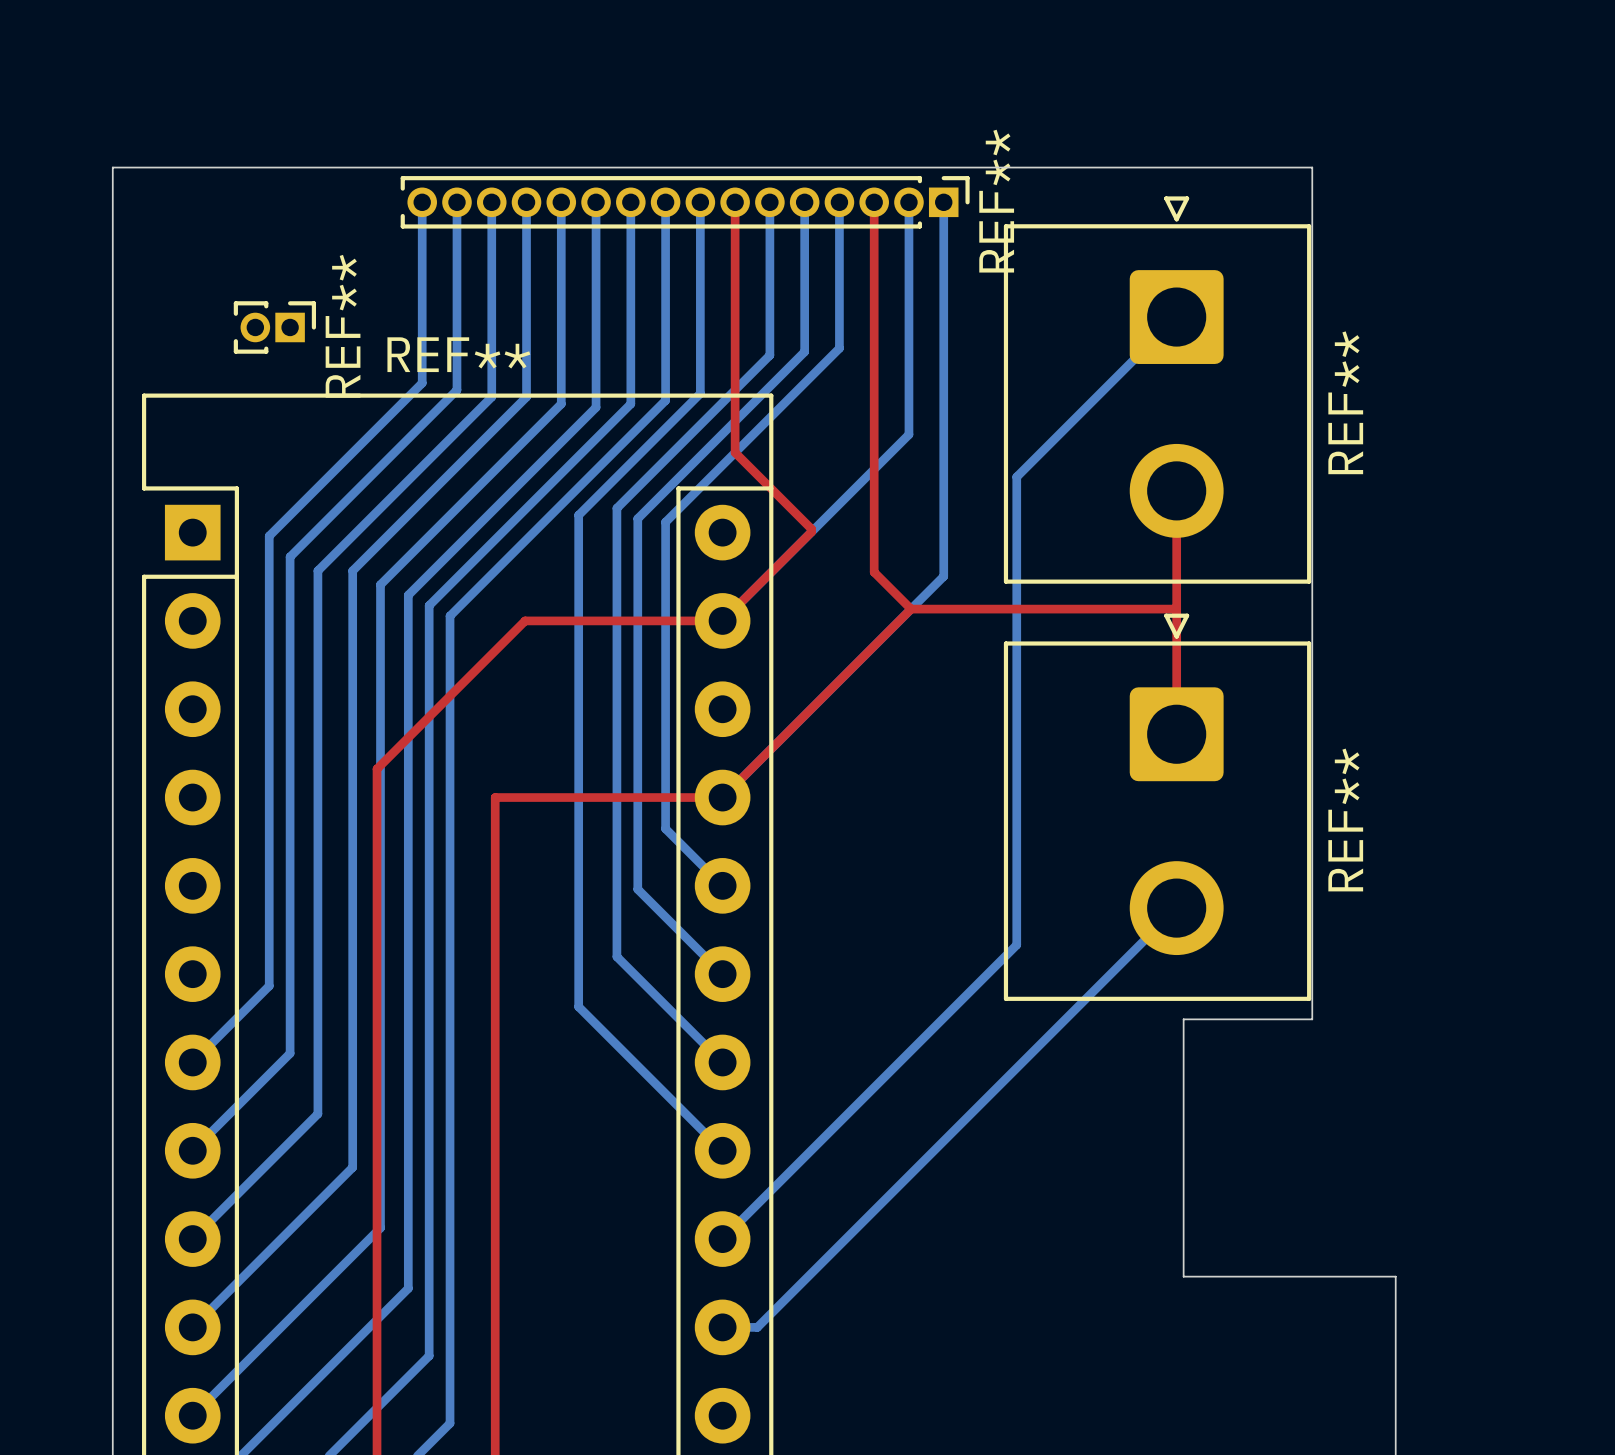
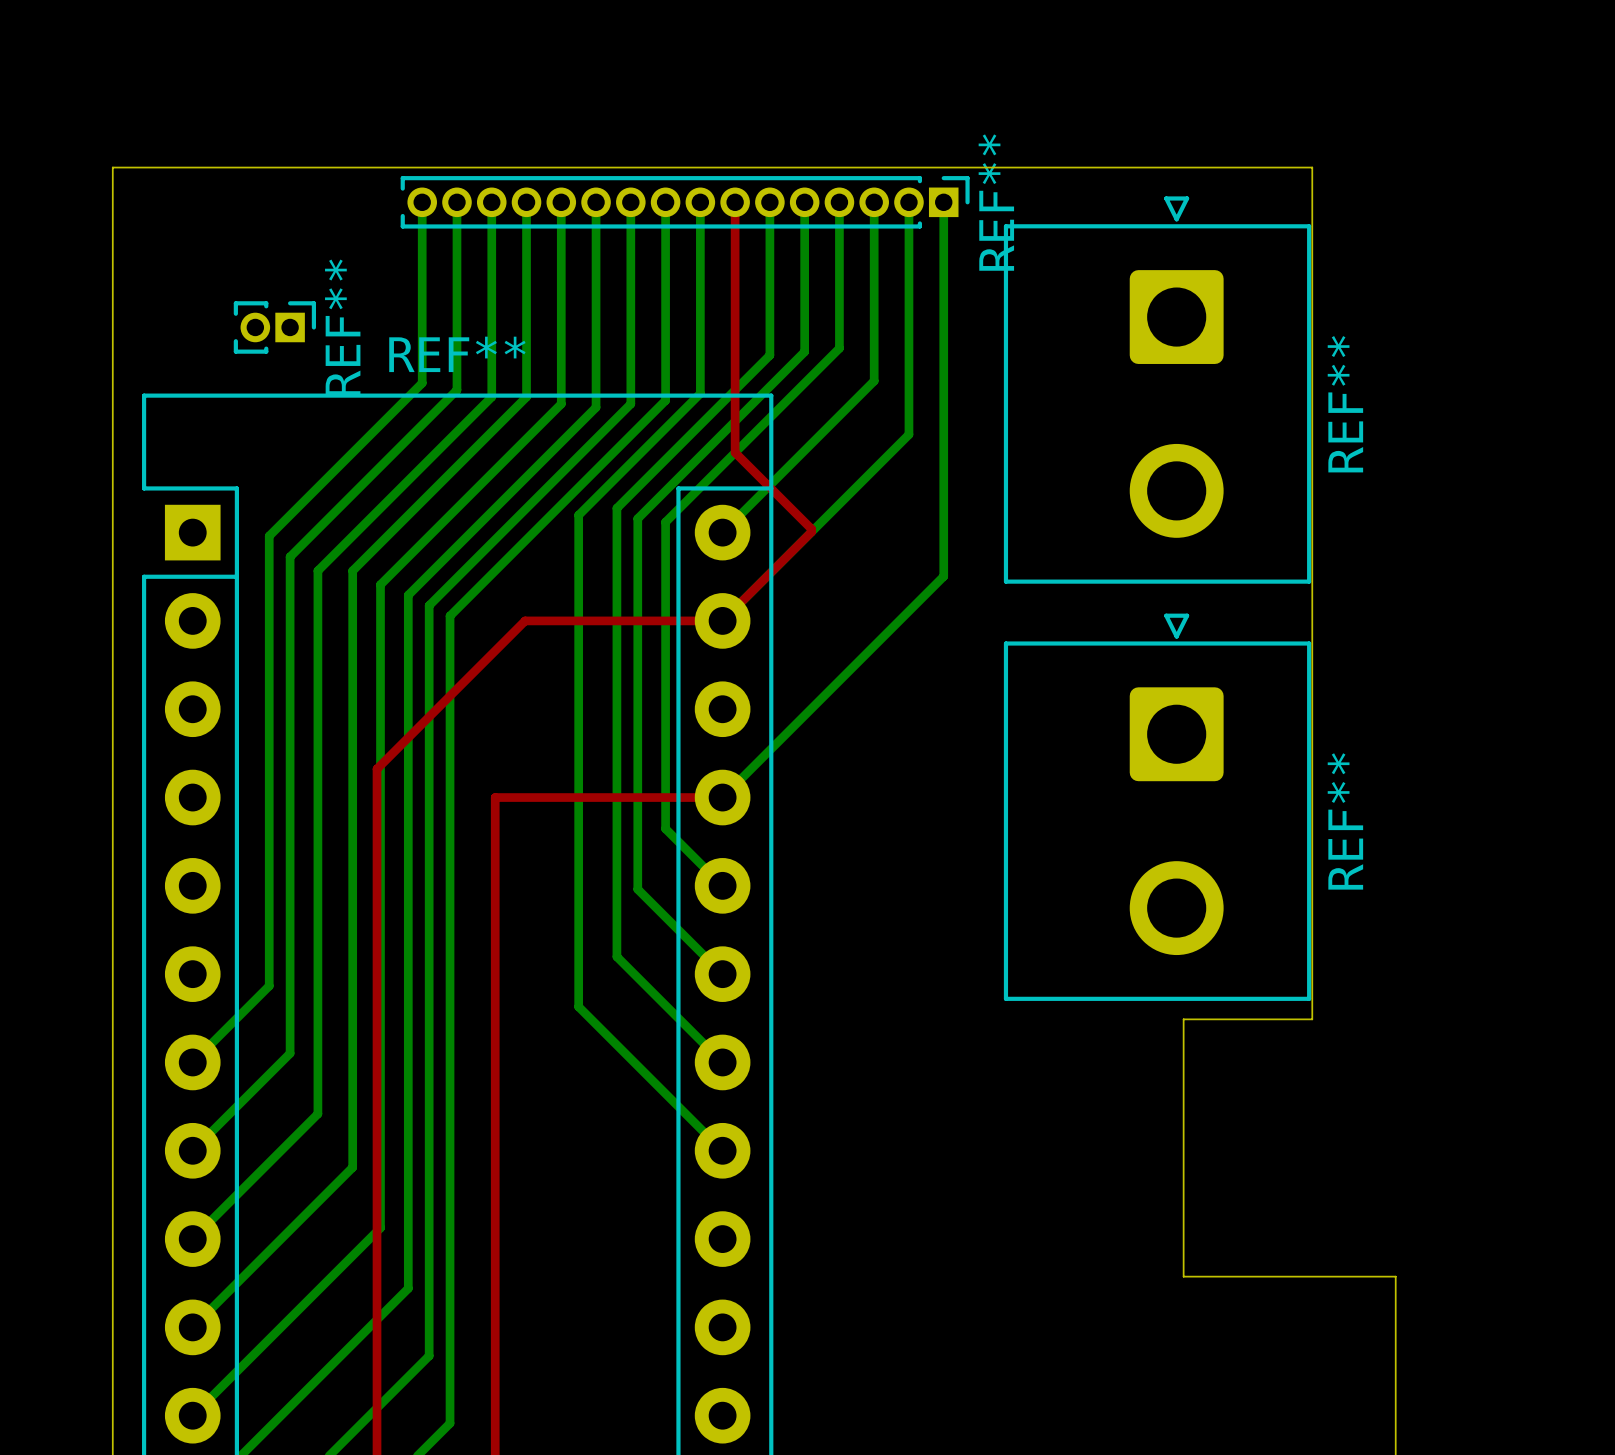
bottom track: none -> (874, 202) (874, 381) (722, 532)
top track: (874, 202) (874, 572) (911, 609) -> none
bottom track: (1176, 317) (1016, 476) (1016, 944) (722, 1239) -> none
top track: (1176, 490) (1176, 734) -> none
top track: (911, 609) (722, 797) -> none
top track: (911, 609) (1176, 609) -> none
bottom track: (1176, 908) (757, 1327) (722, 1327) -> none

